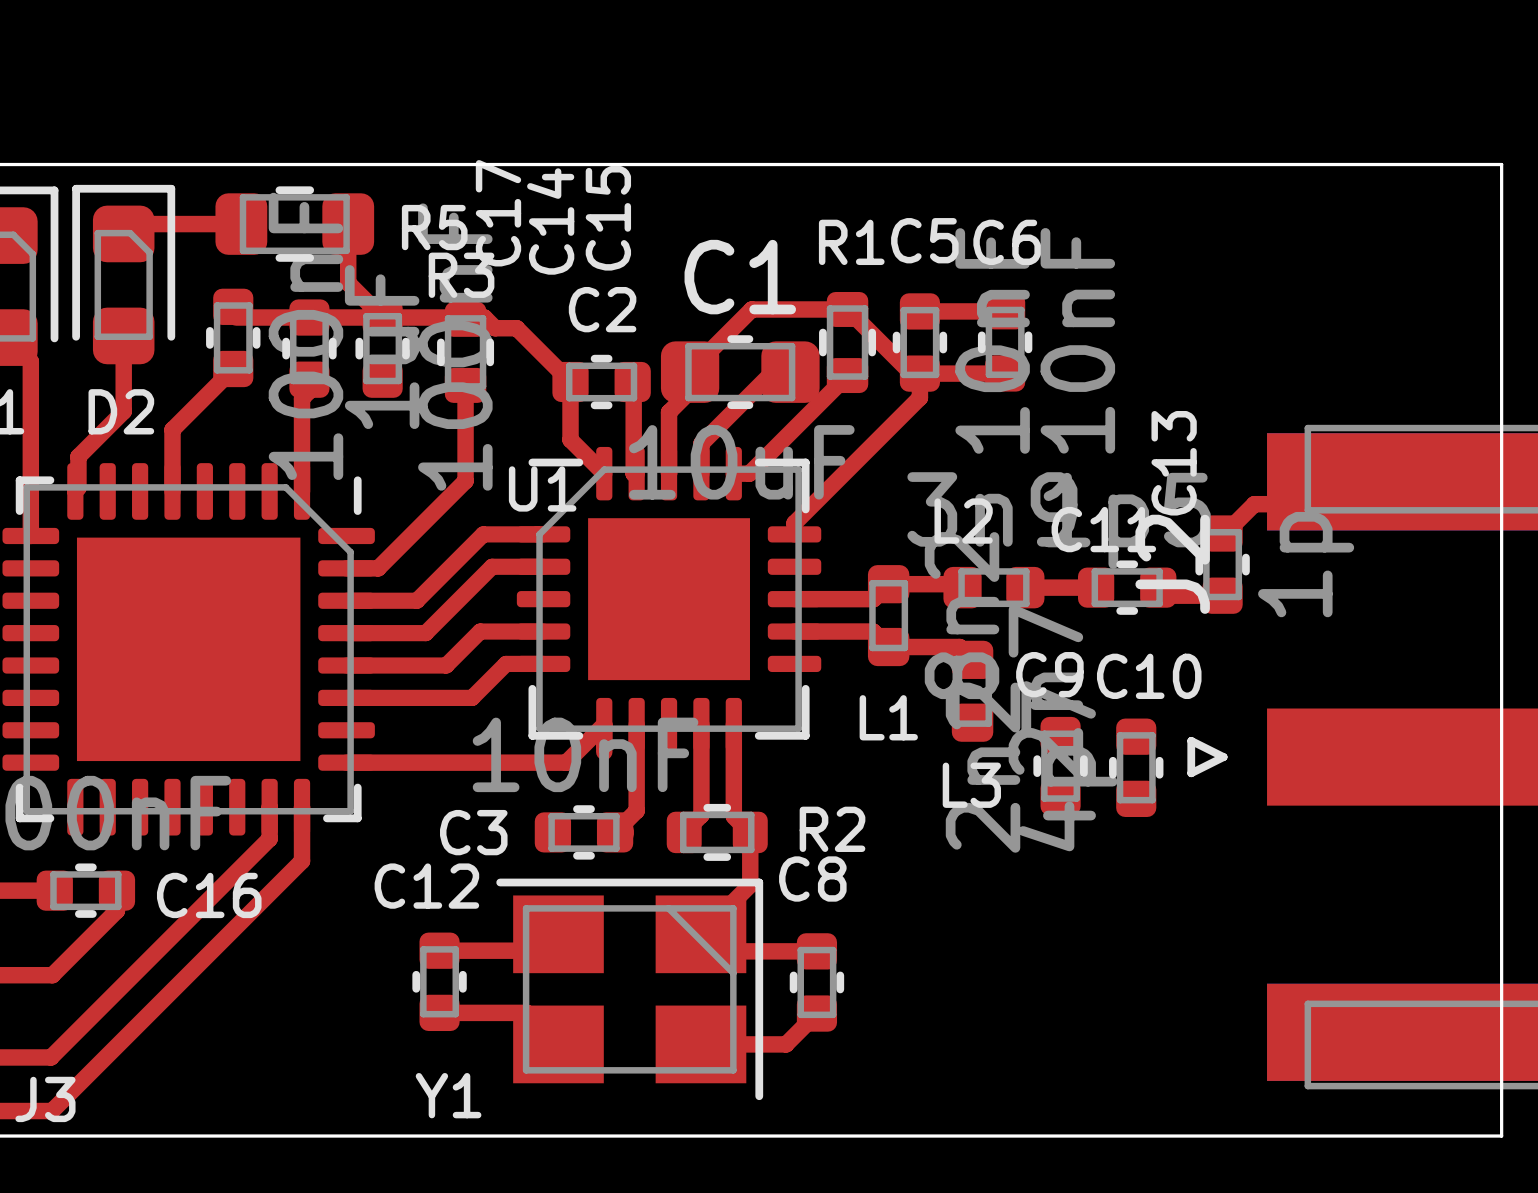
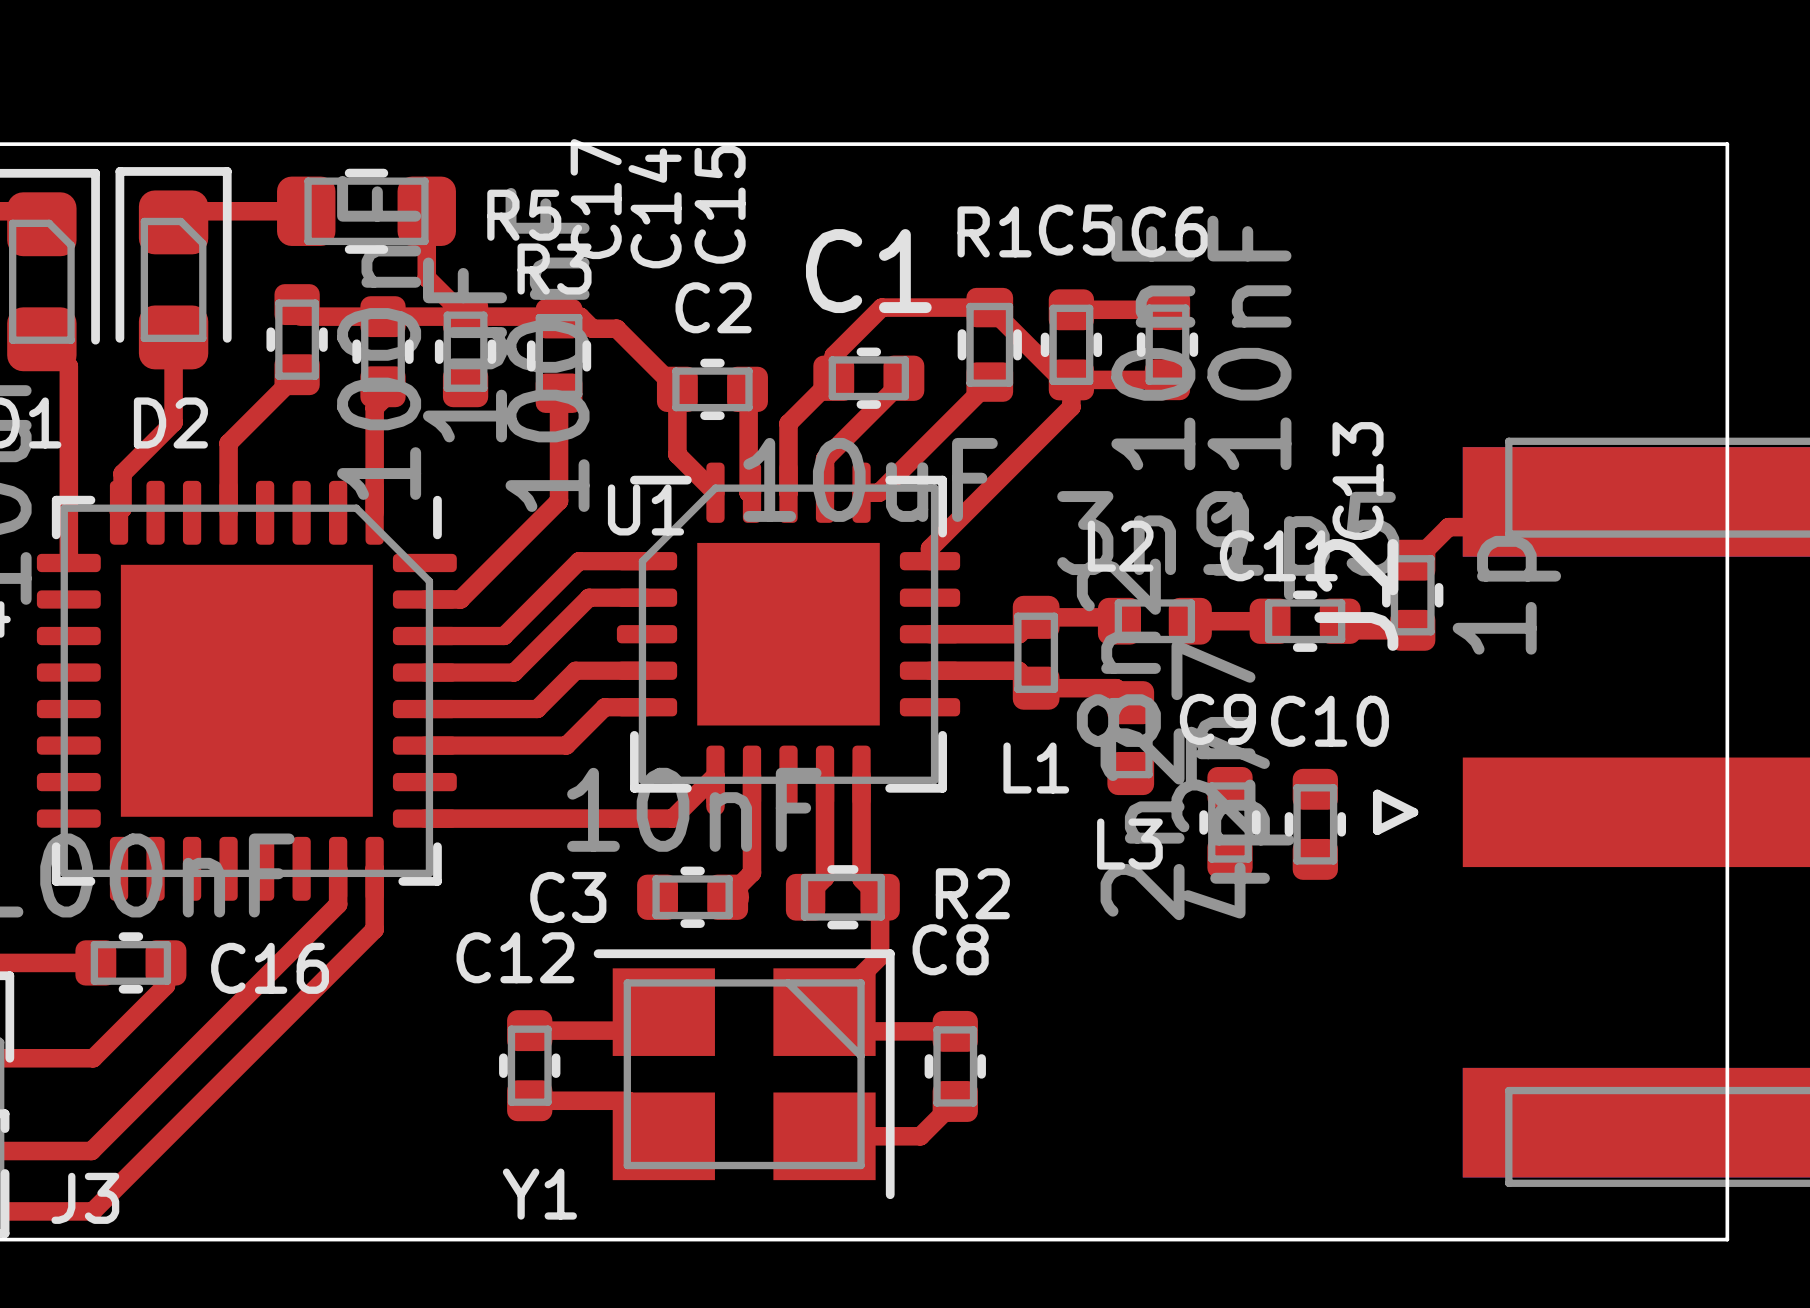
C1 footprint: [660, 335, 820, 410] -> [813, 347, 925, 409]

